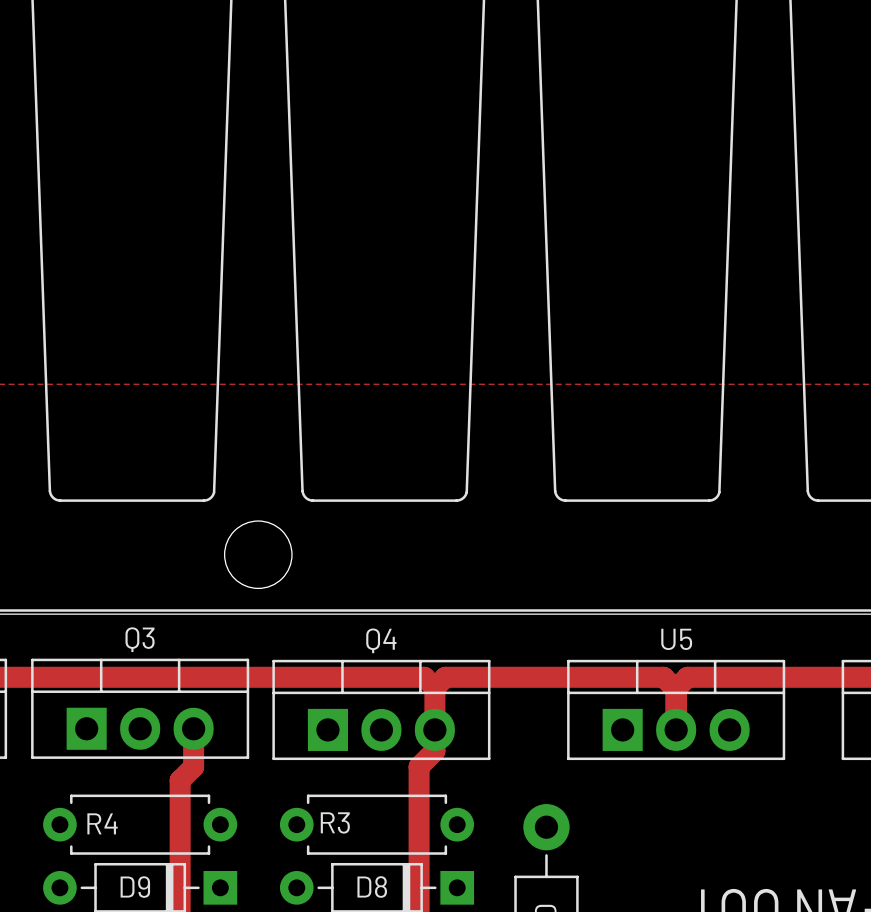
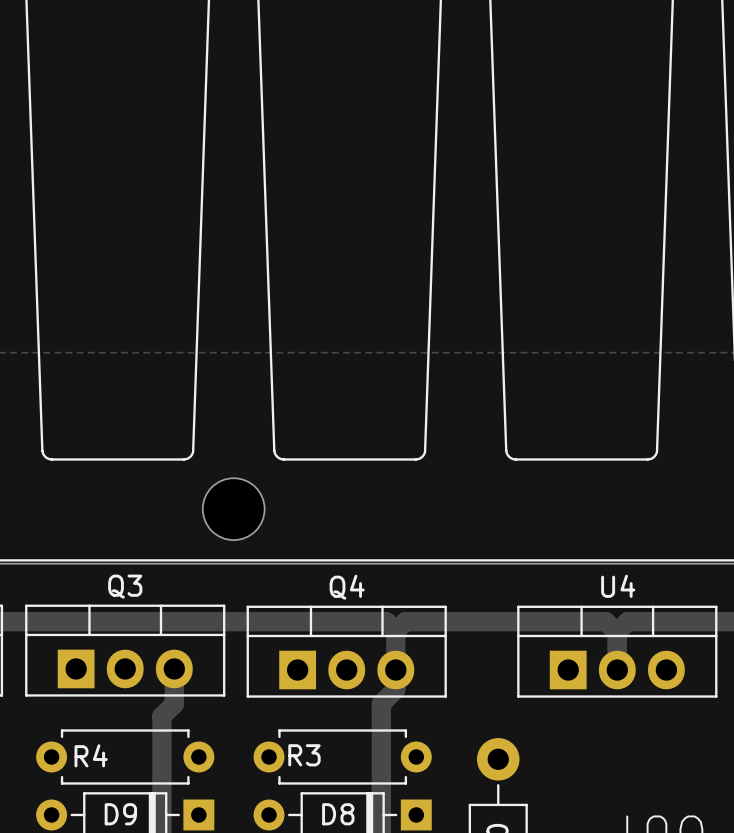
U5 name: U5 (676, 639) -> U4 (618, 586)

